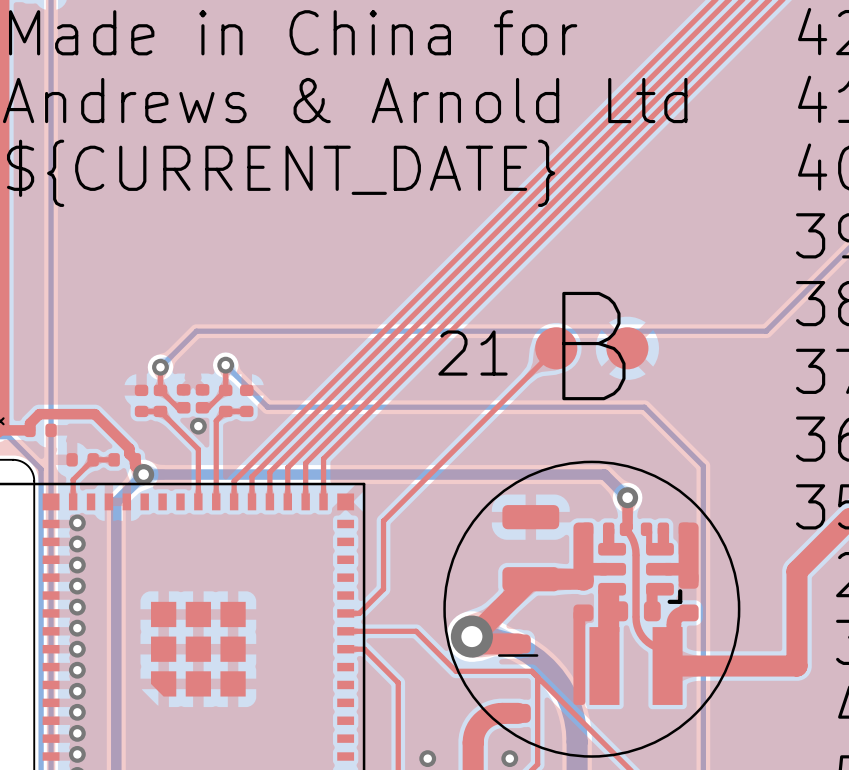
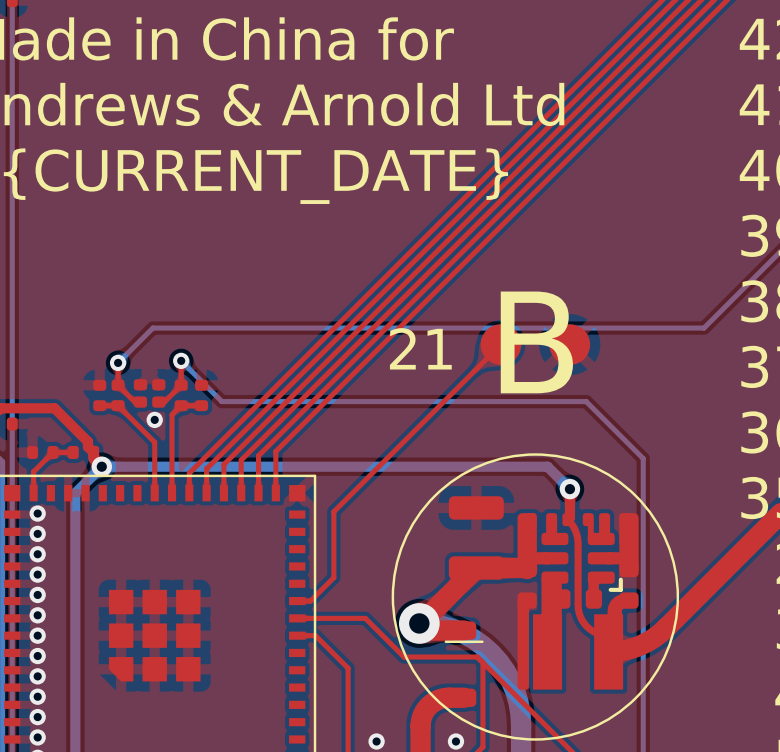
top track: (796, 571) (796, 666) (667, 666) -> (733, 560) (653, 638) (632, 648) (608, 651)

